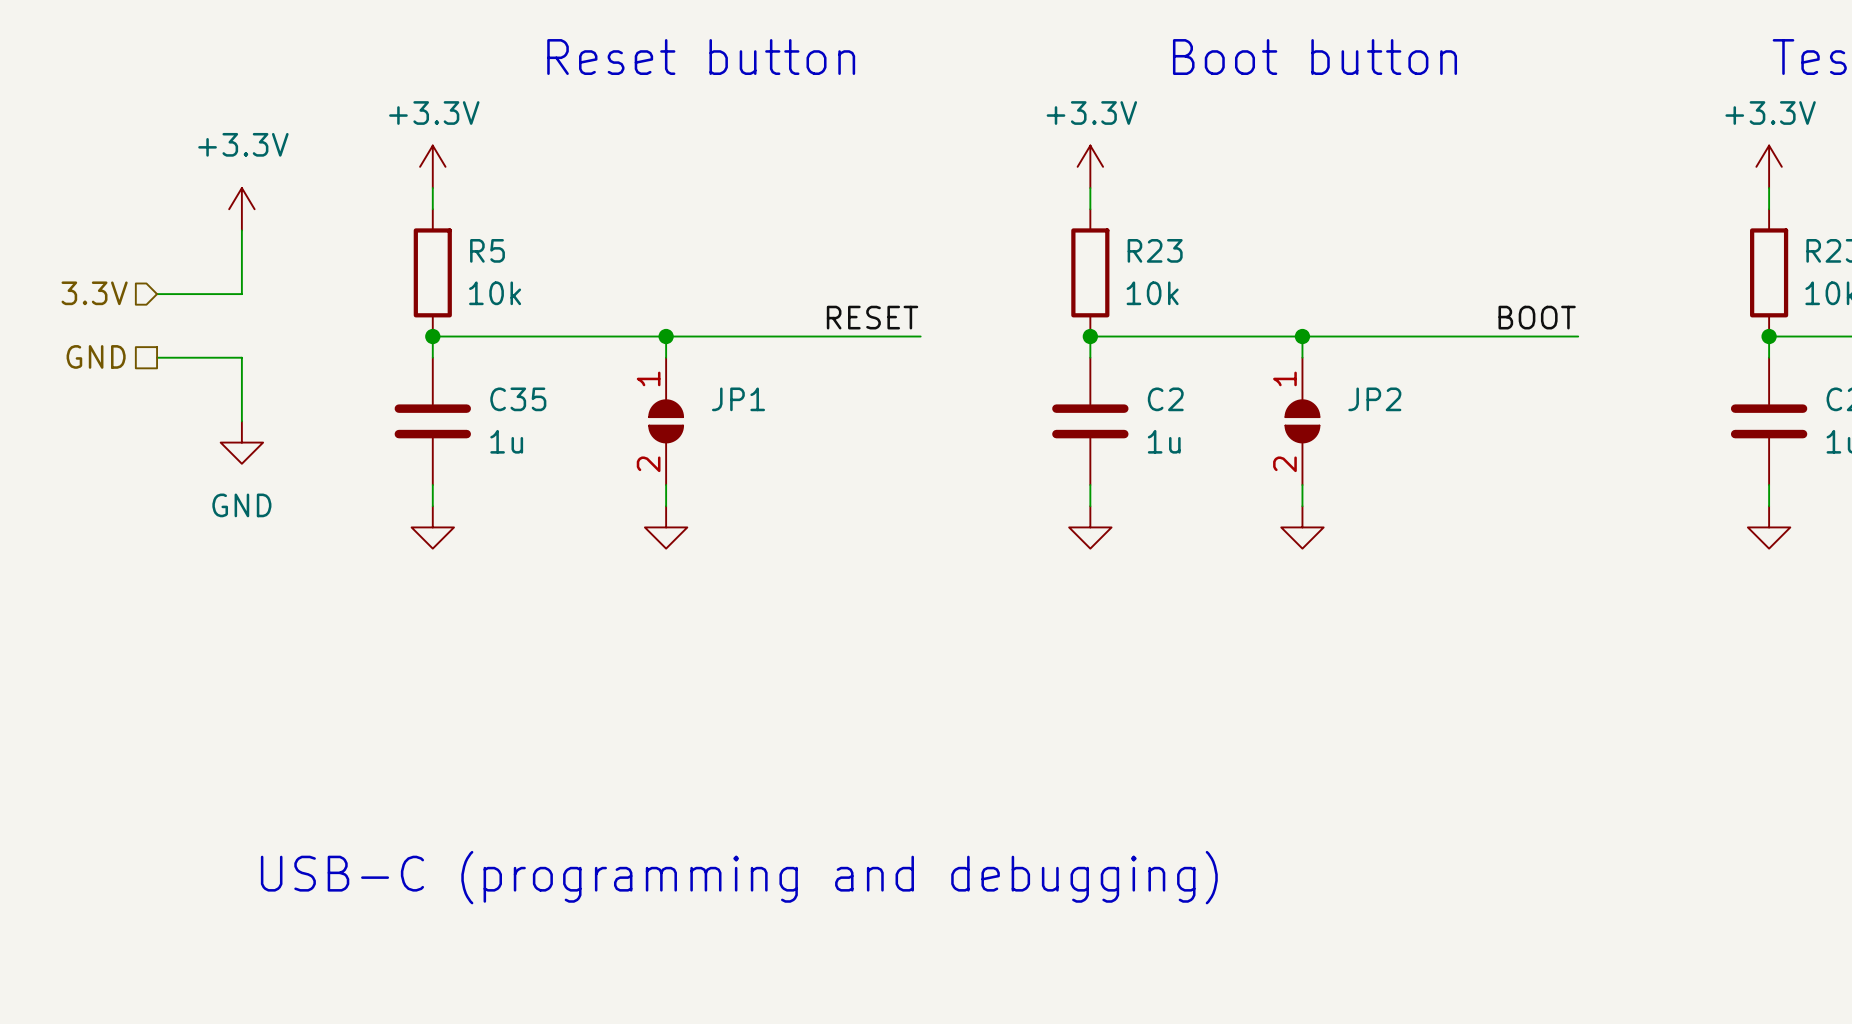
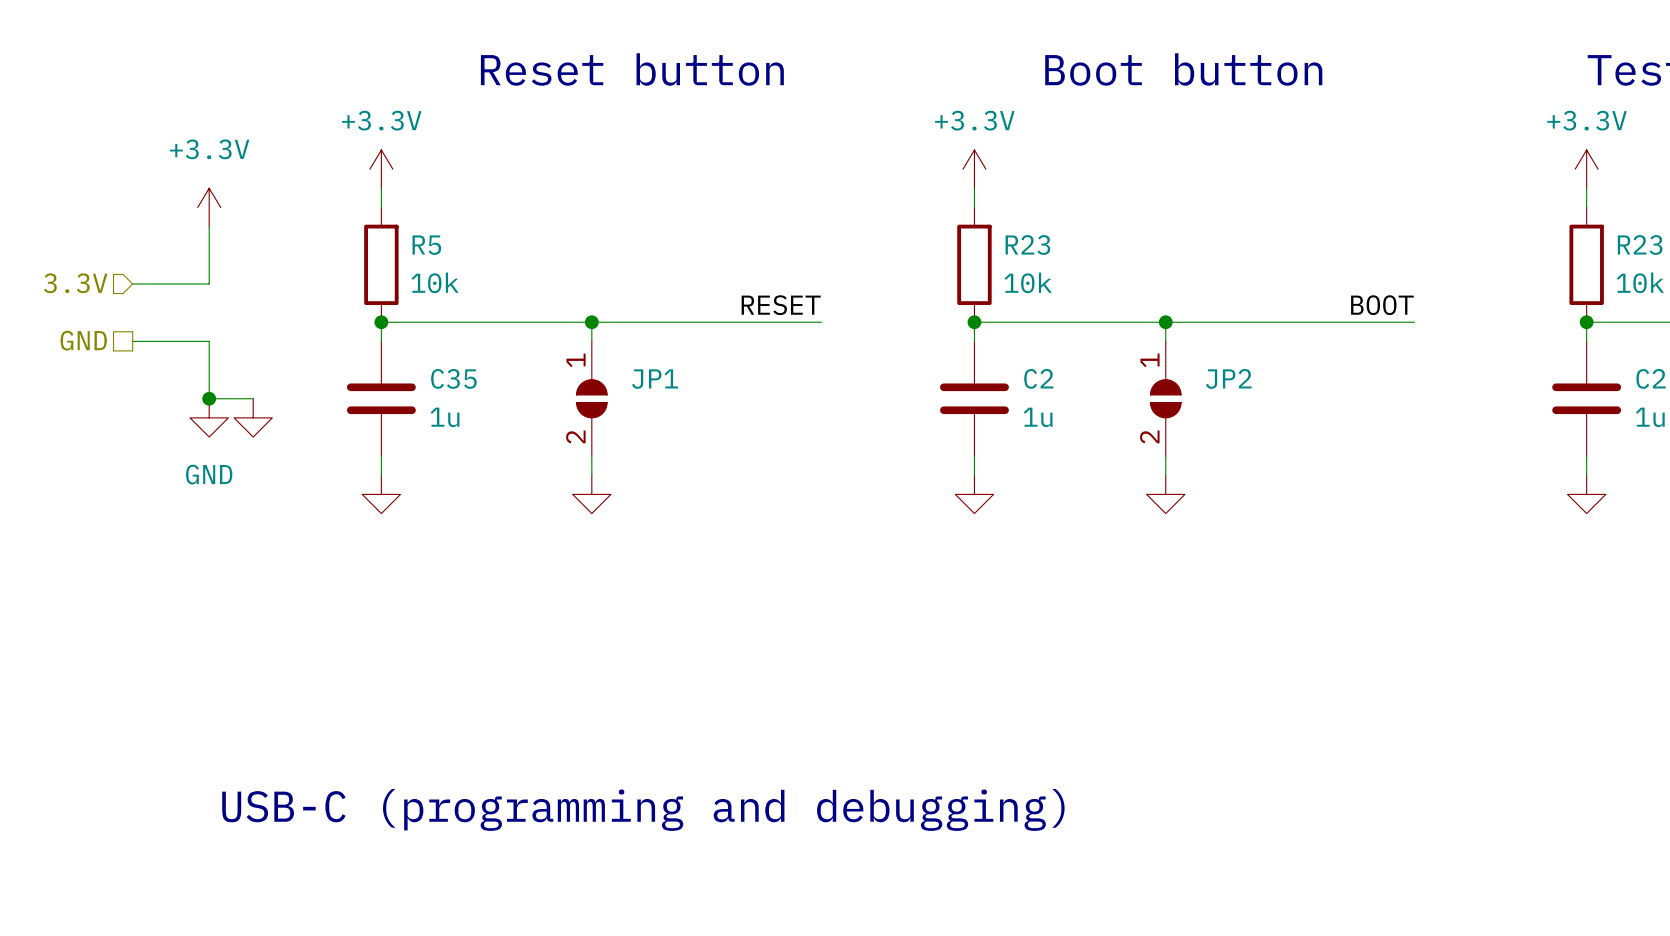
wire: none -> (209, 398) (253, 398)
junction: none -> (209, 398)
power symbol: none -> (253, 417)

